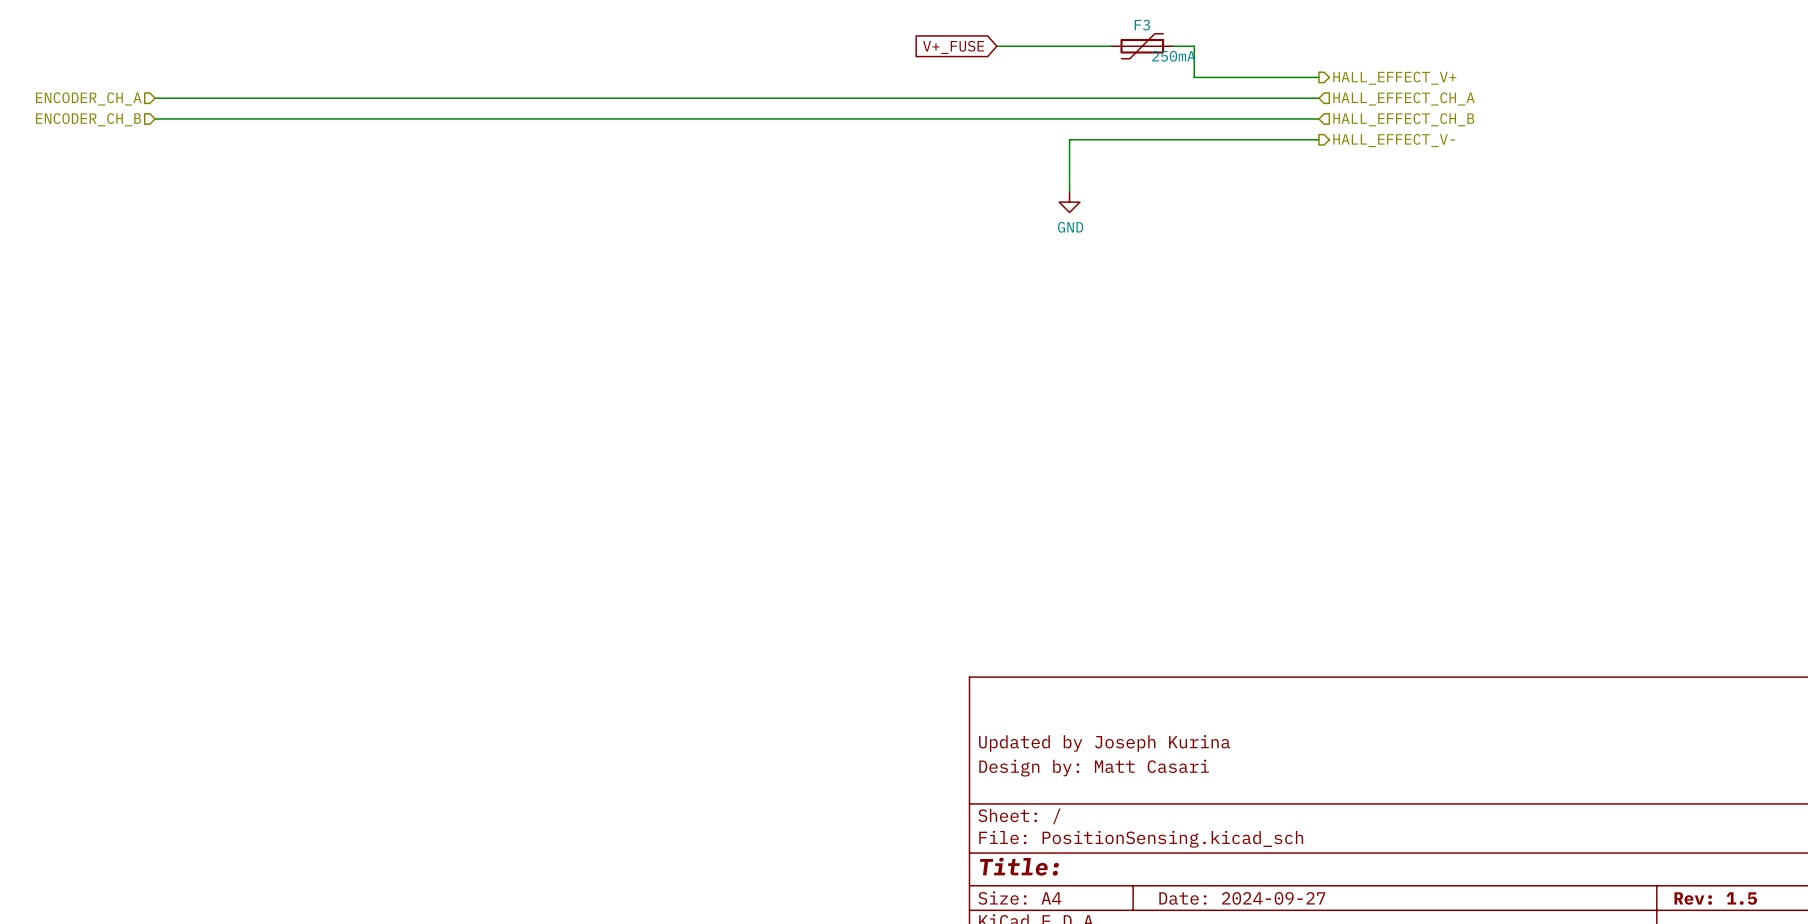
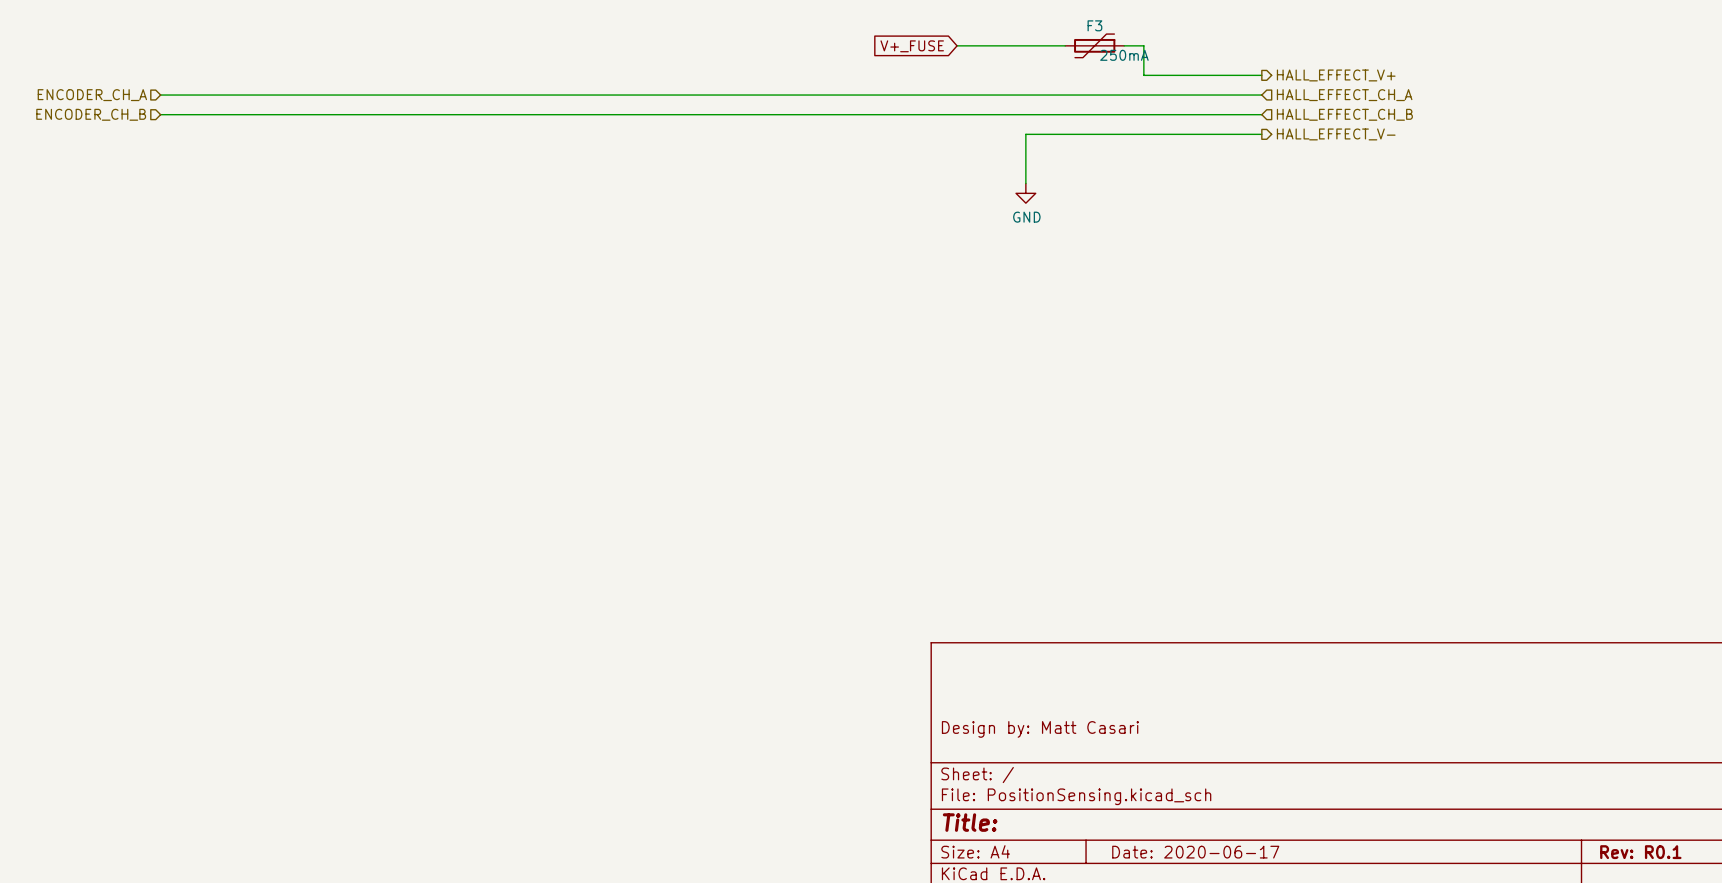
title block: Updated by Joseph Kurina (1104, 743) -> none
title block: Date: 2024-09-27 (1242, 898) -> Date: 2020-06-17 (1195, 852)
title block: Rev: 1.5 (1715, 898) -> Rev: R0.1 (1640, 852)

